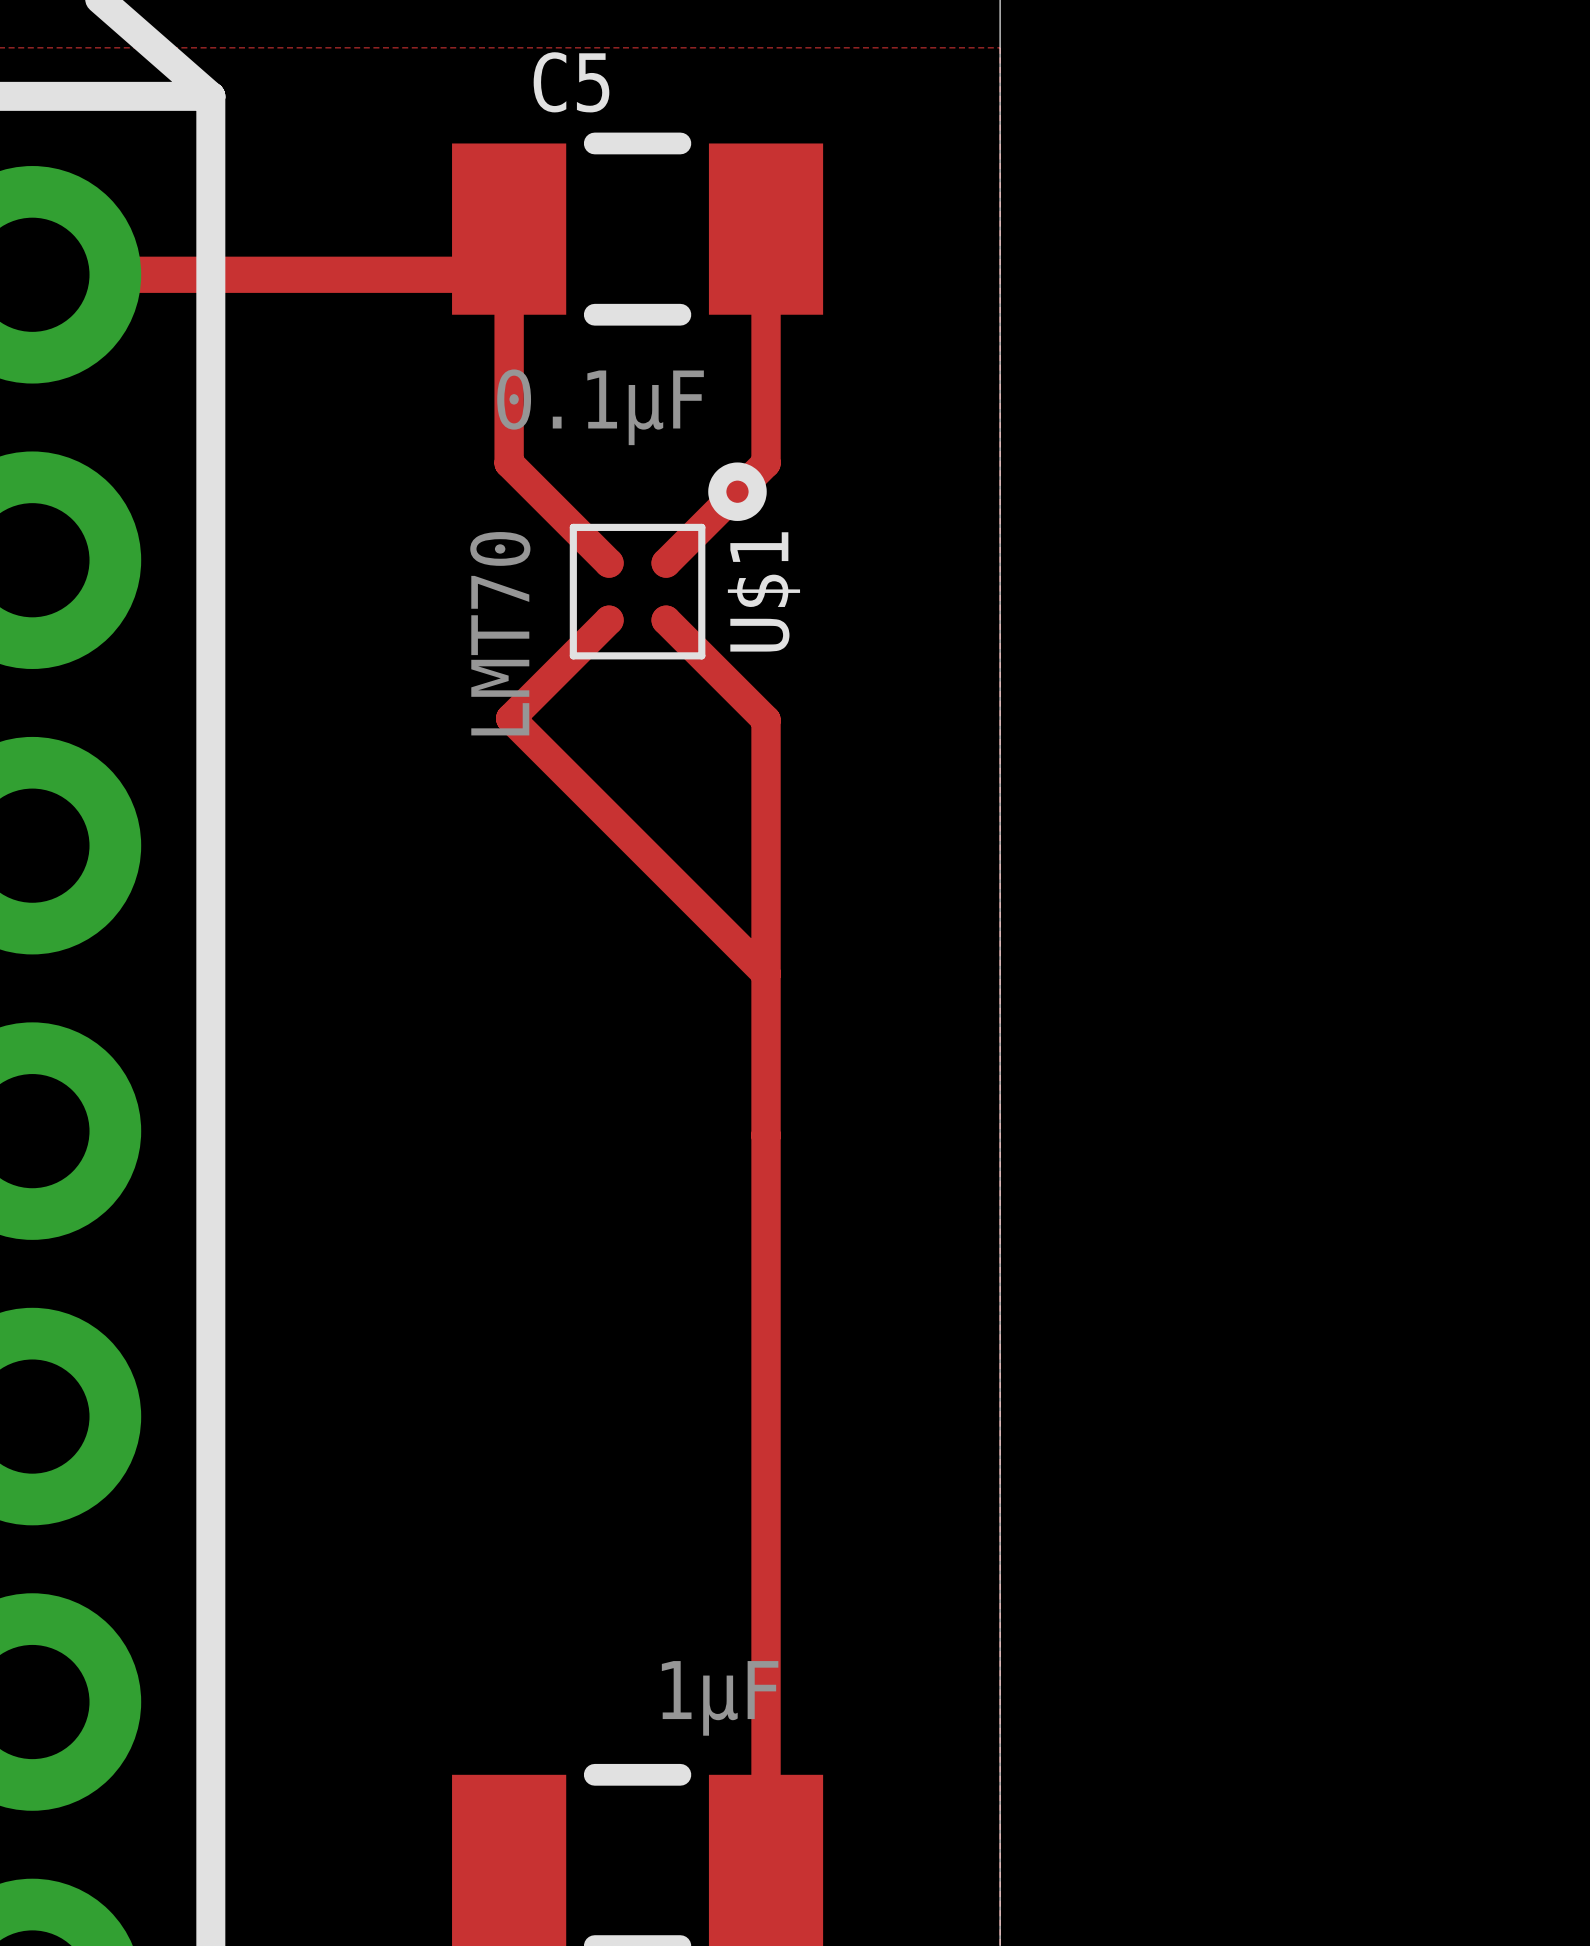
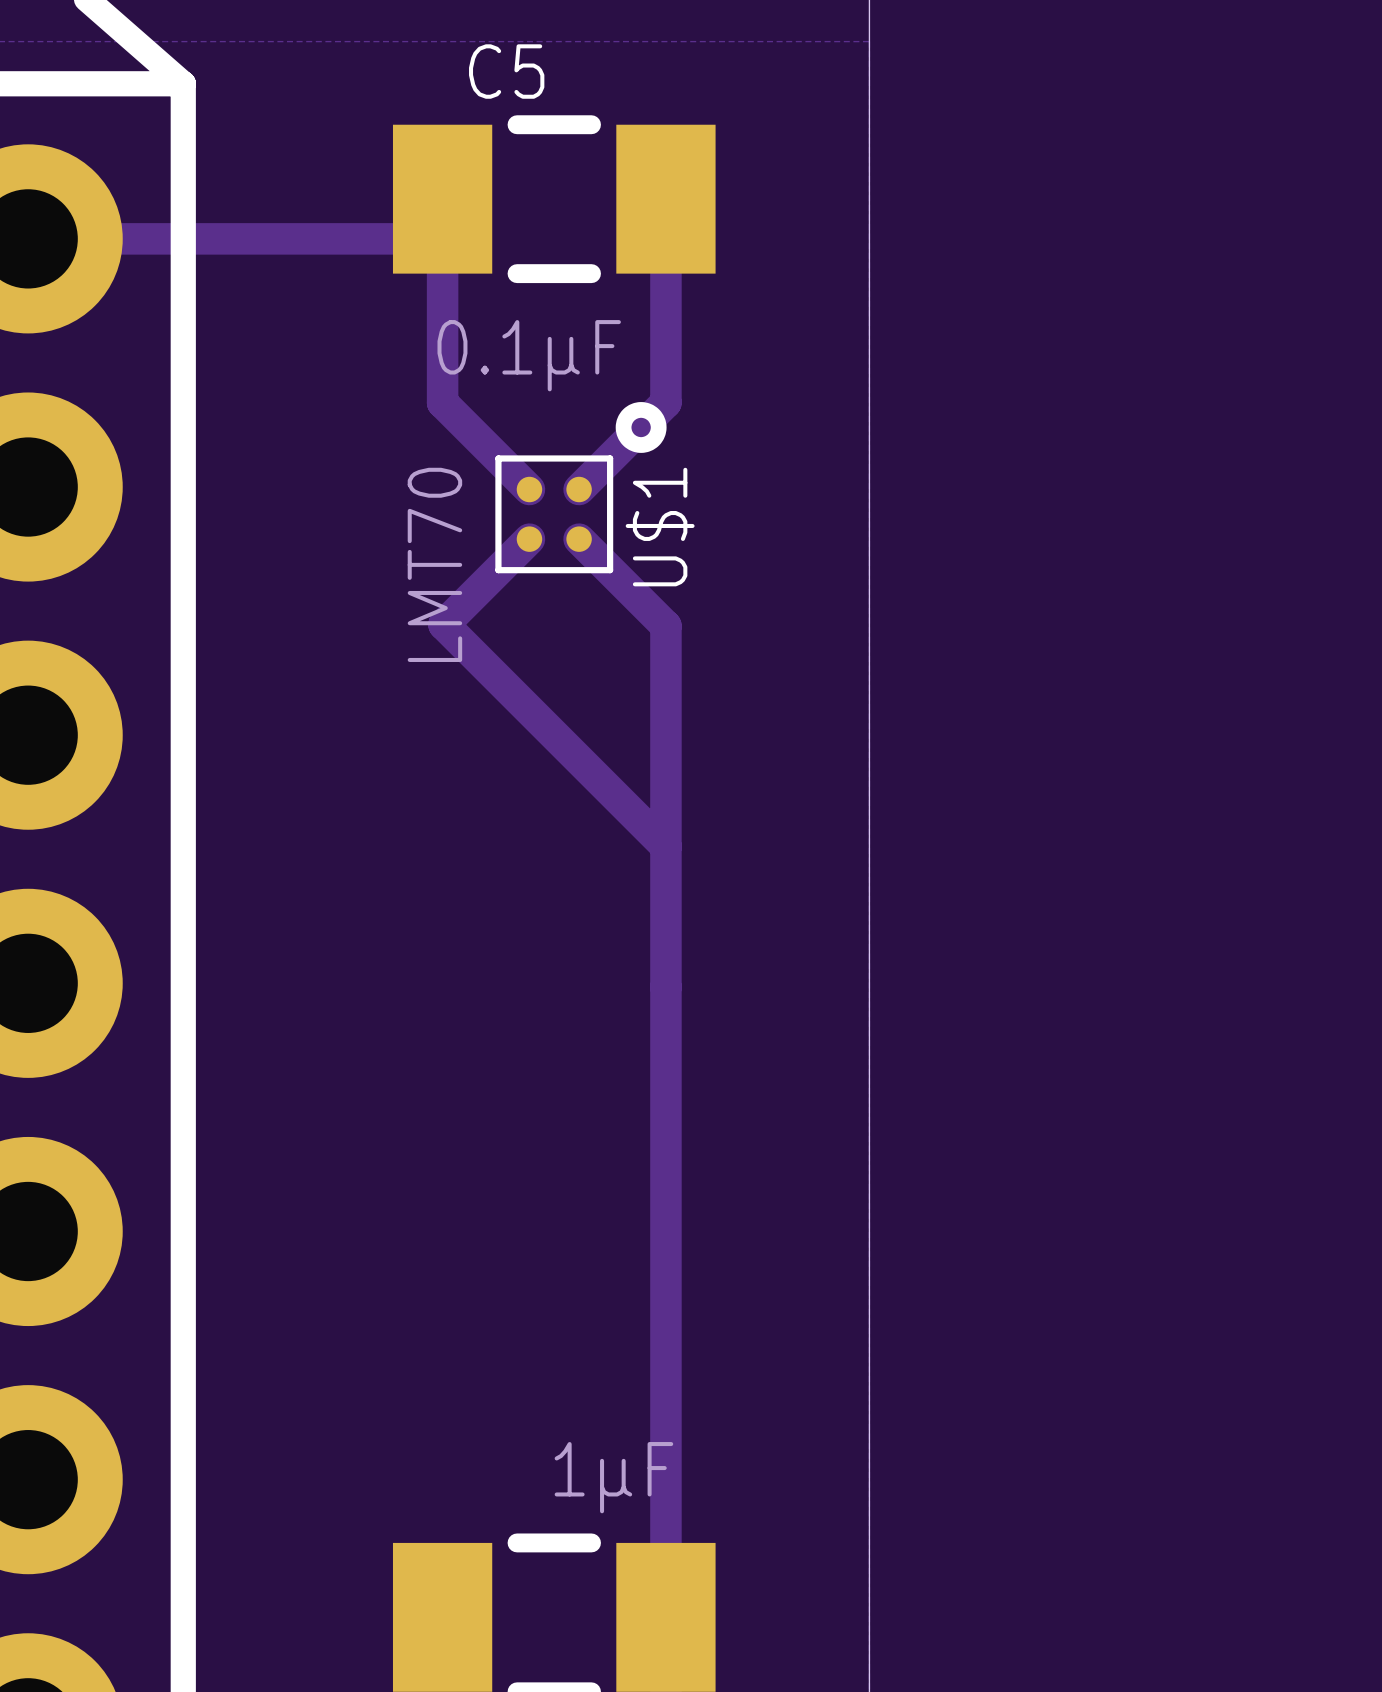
track width: thin (766, 229) (766, 463) (666, 563) -> thick (665, 199) (665, 402) (579, 489)
track width: thin (509, 274) (509, 463) (609, 563) -> thick (442, 238) (442, 402) (529, 489)
track width: thin (609, 620) (510, 718) (766, 973) -> thick (529, 539) (443, 624) (665, 846)
track width: thin (666, 620) (766, 720) (766, 1860) -> thick (579, 539) (665, 626) (665, 1617)

